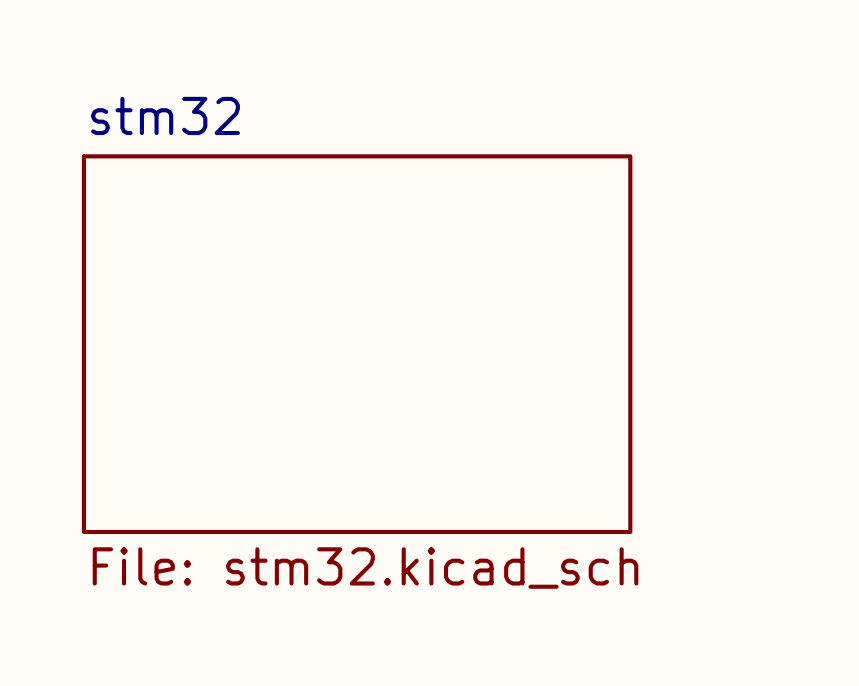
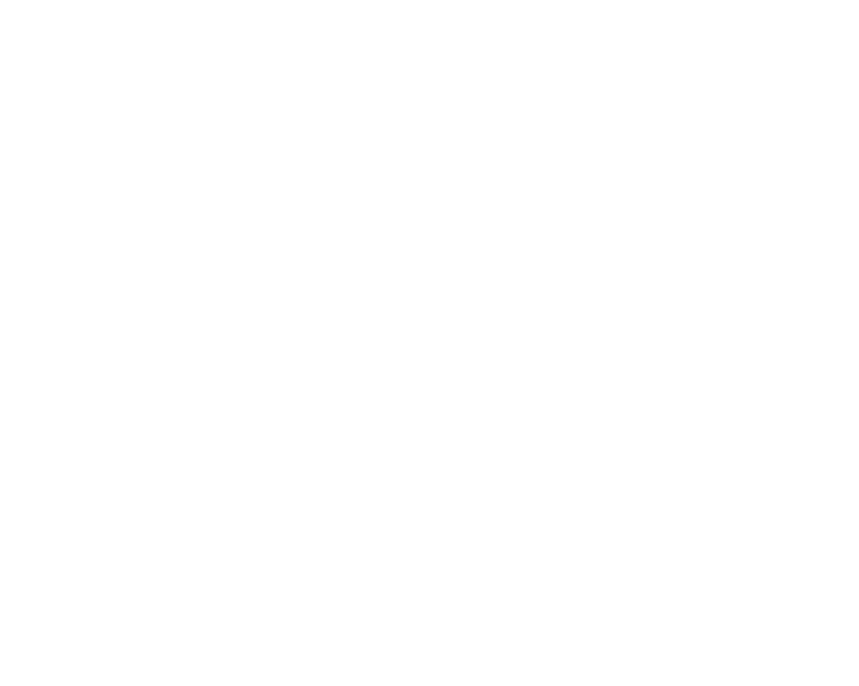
sheet stm32: File: stm32.kicad_sch (357, 344) -> none

